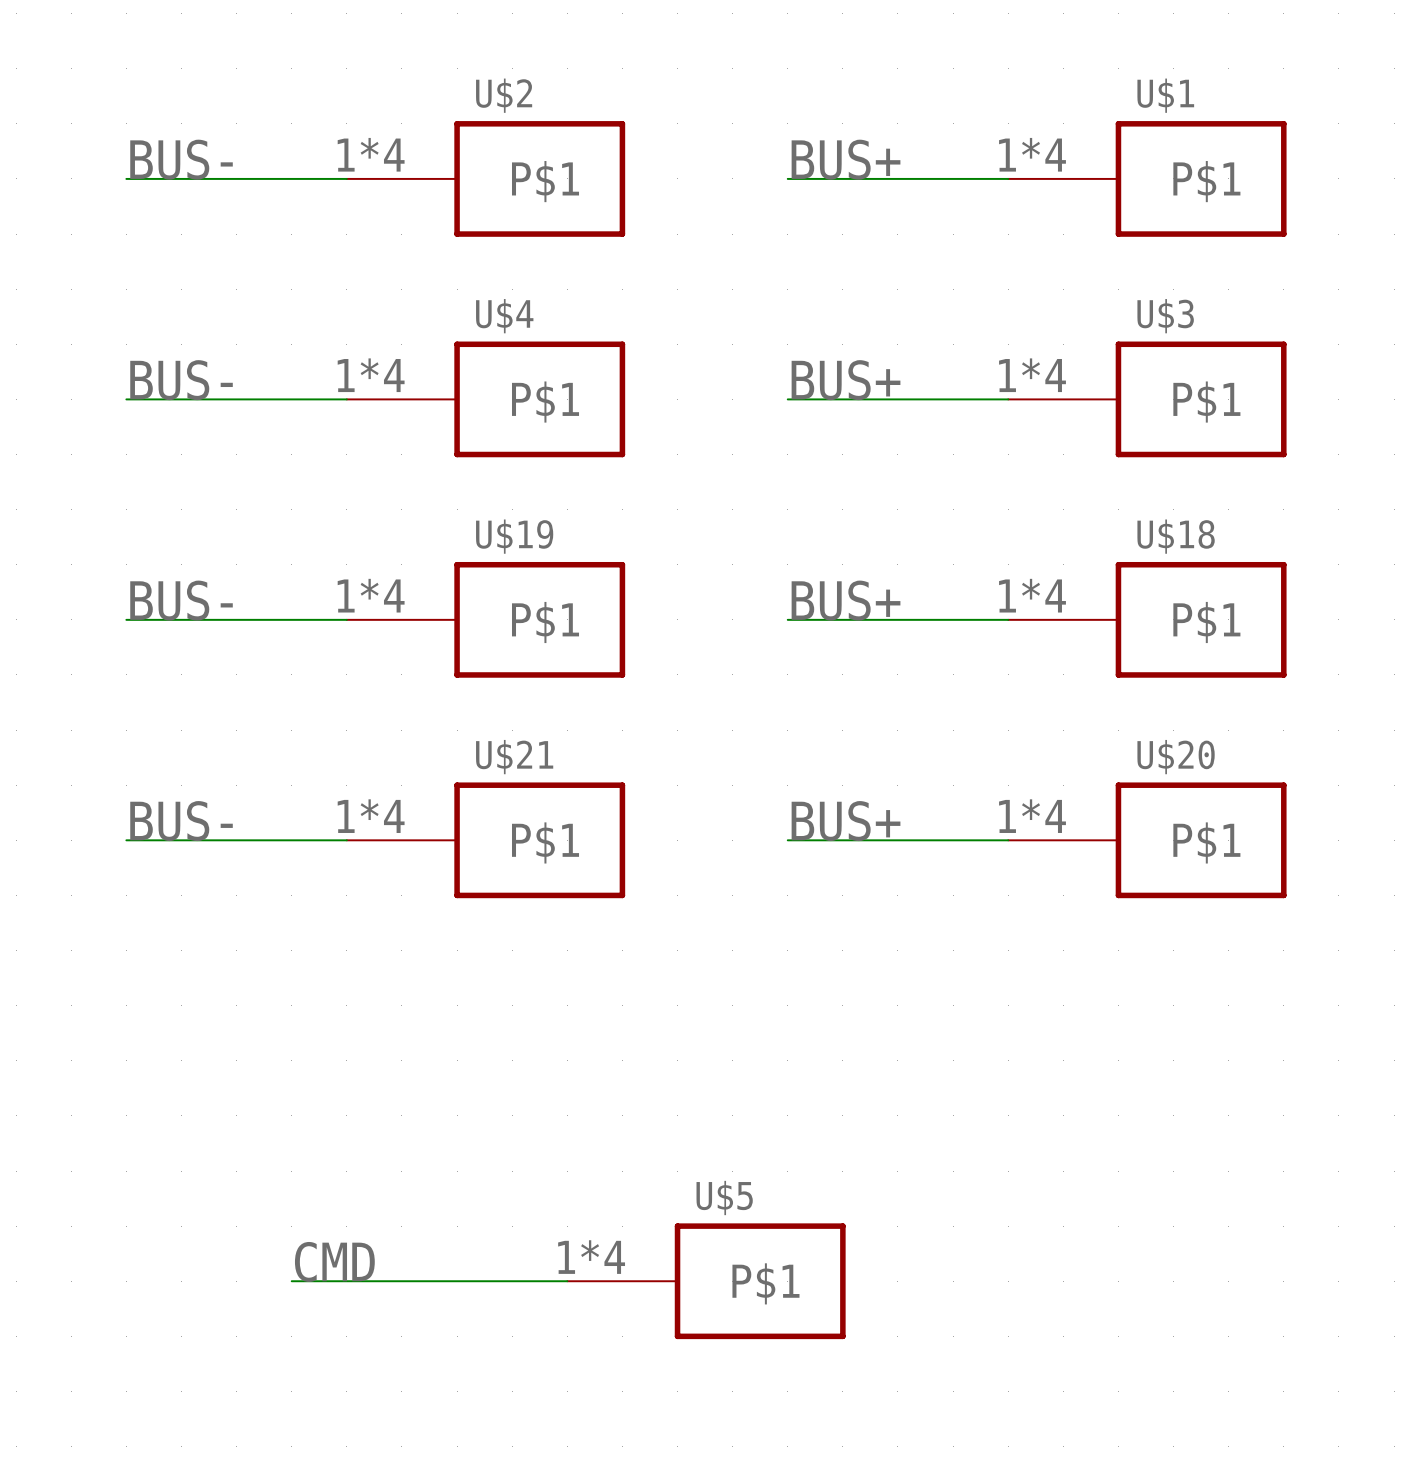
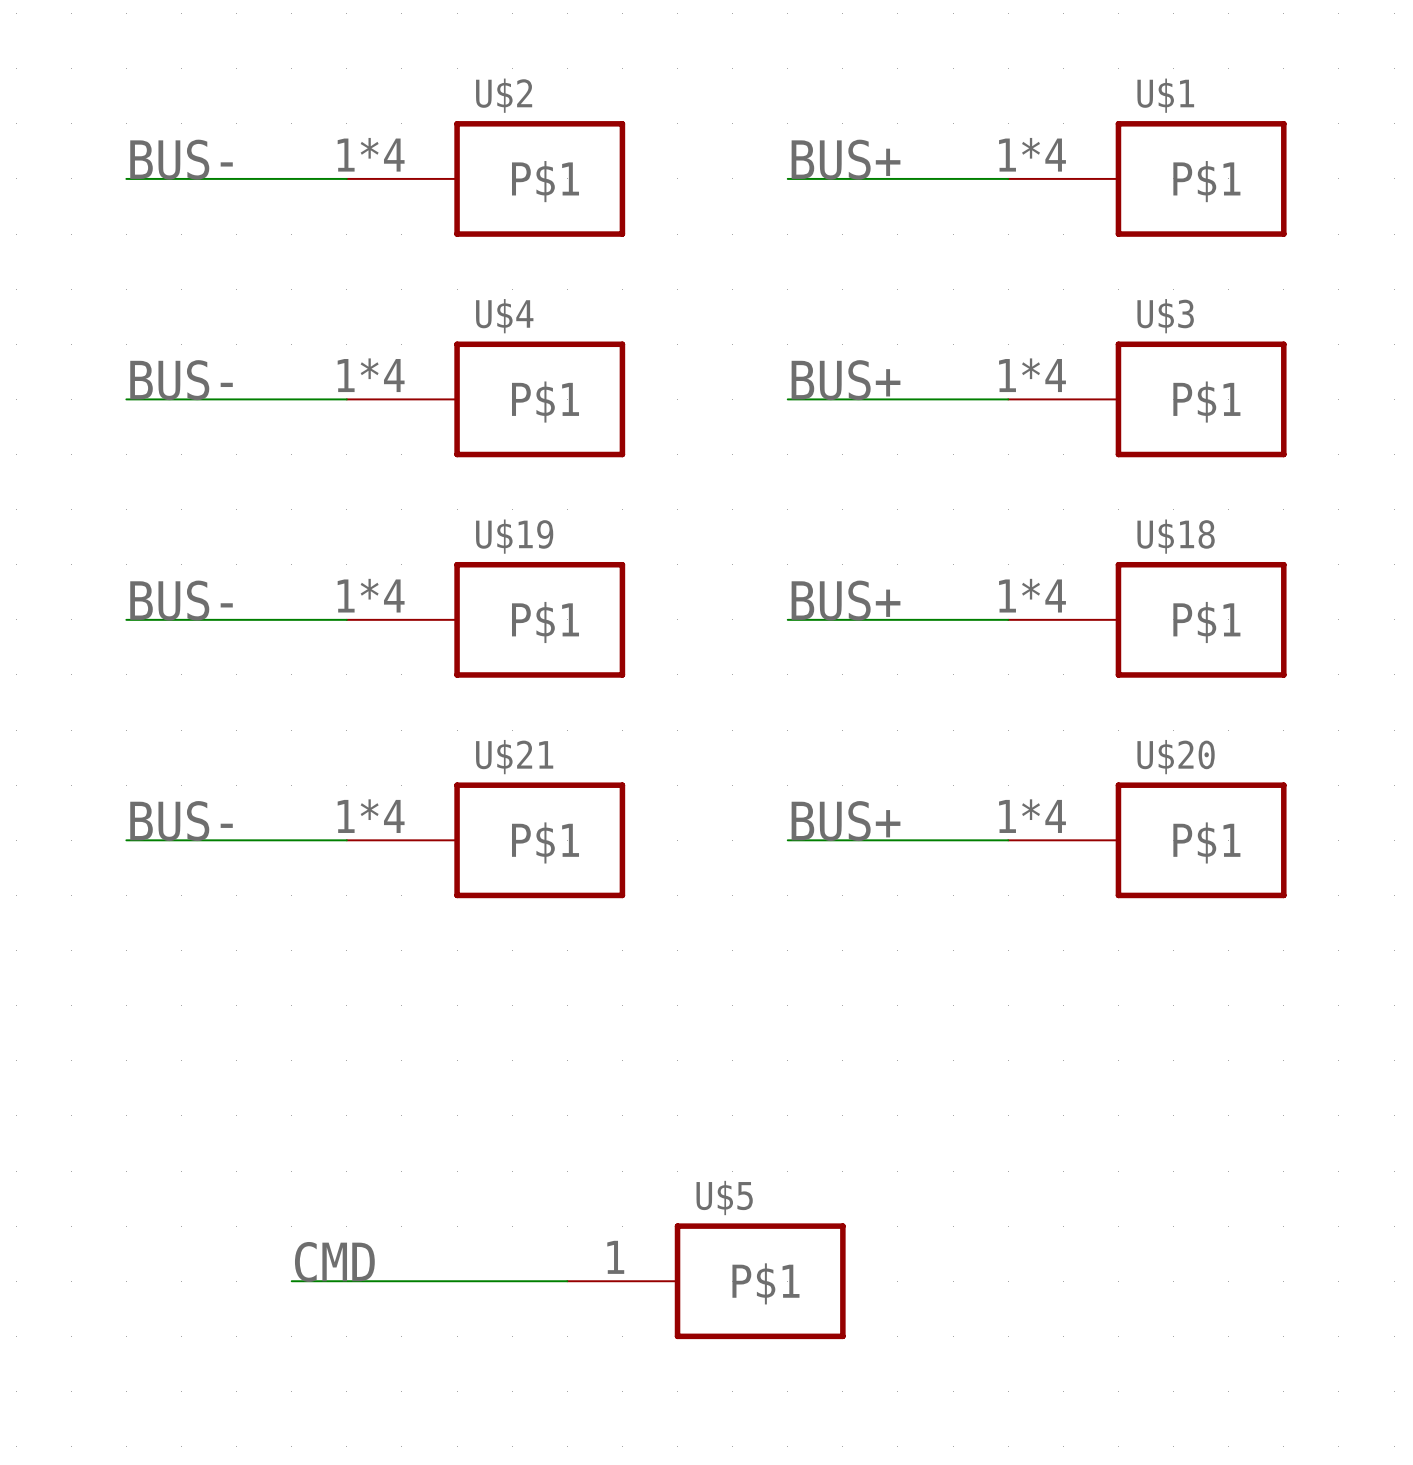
U$5 pin number: 1*4 (591, 1257) -> 1 (615, 1257)

